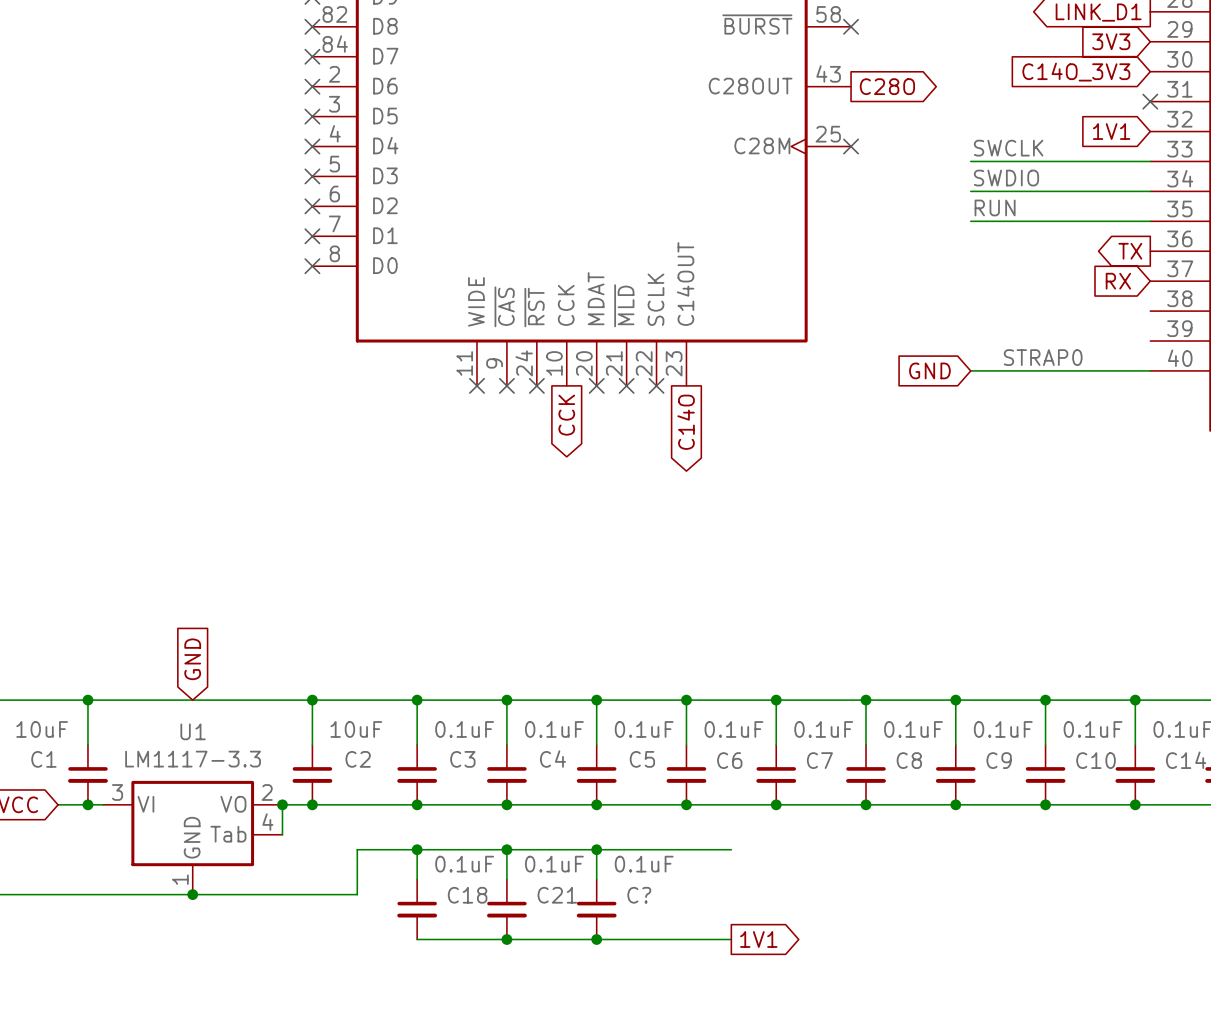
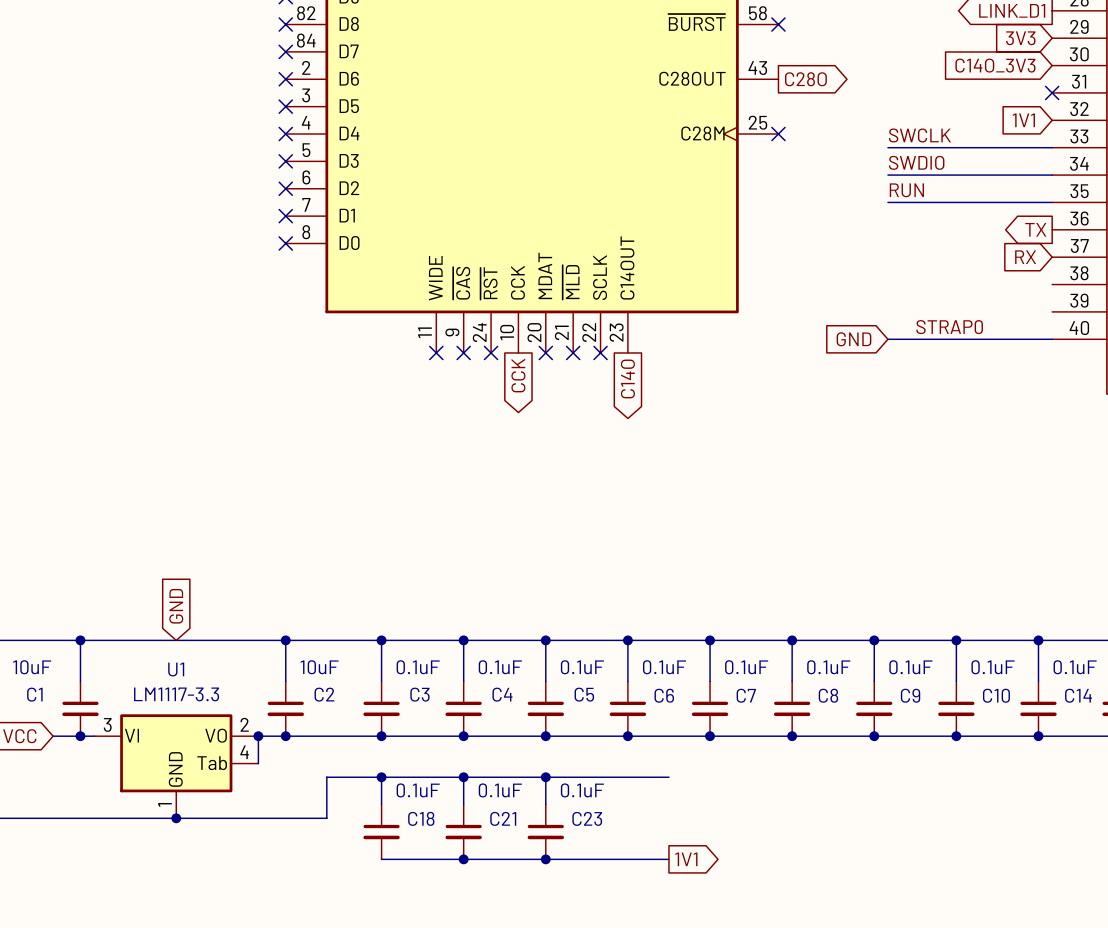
C? name: C? (639, 895) -> C23 (587, 818)

